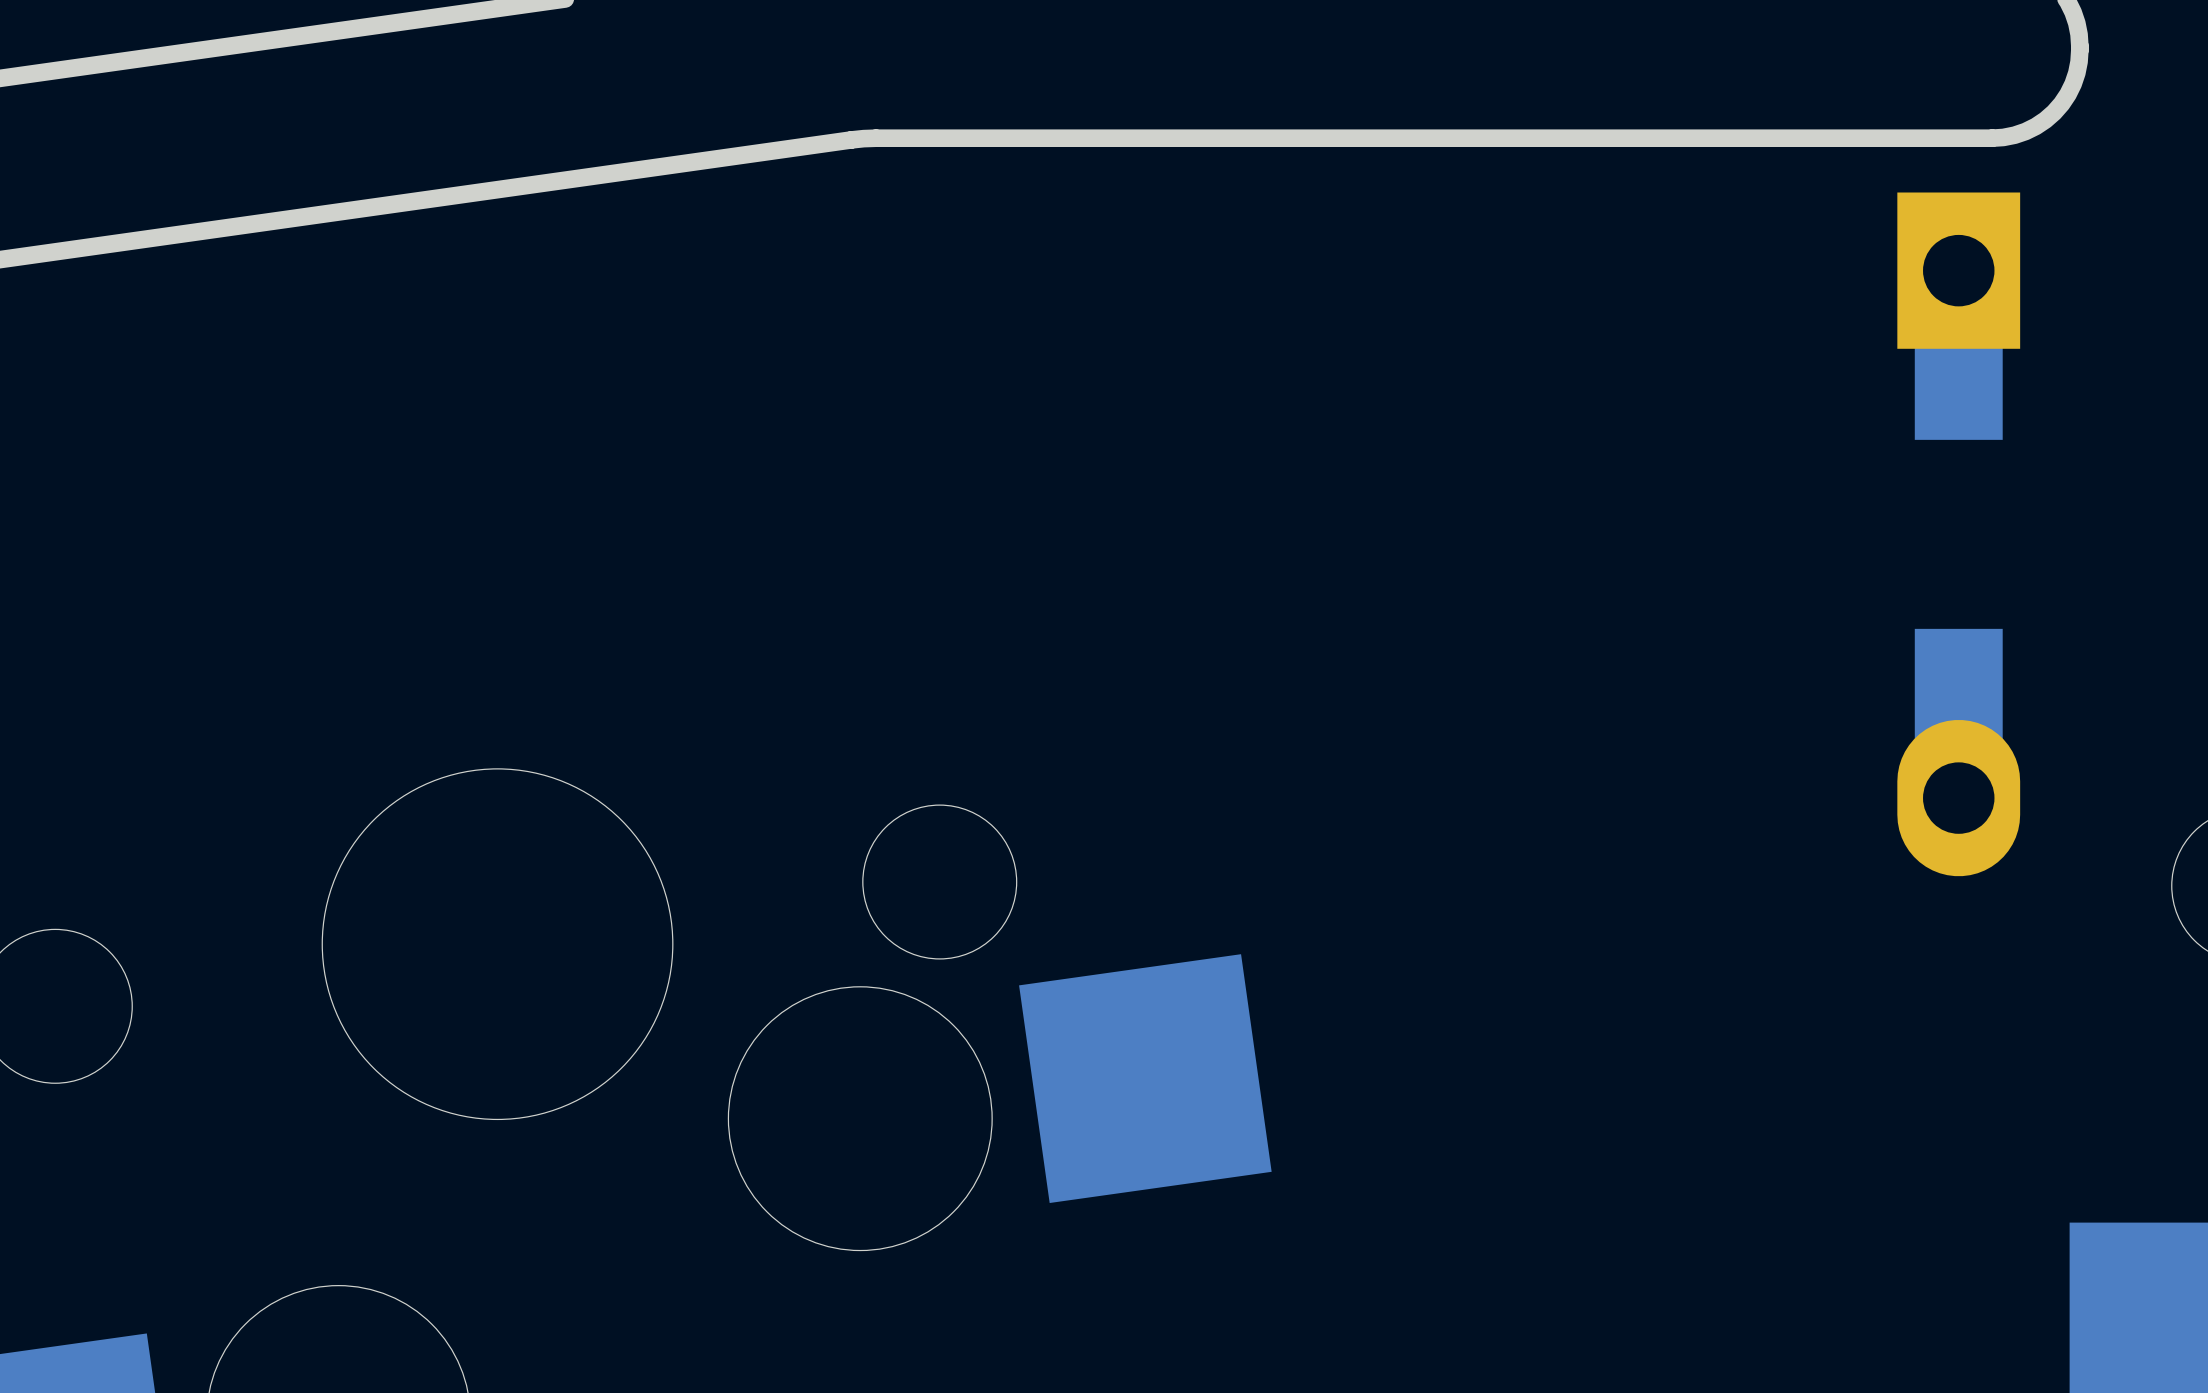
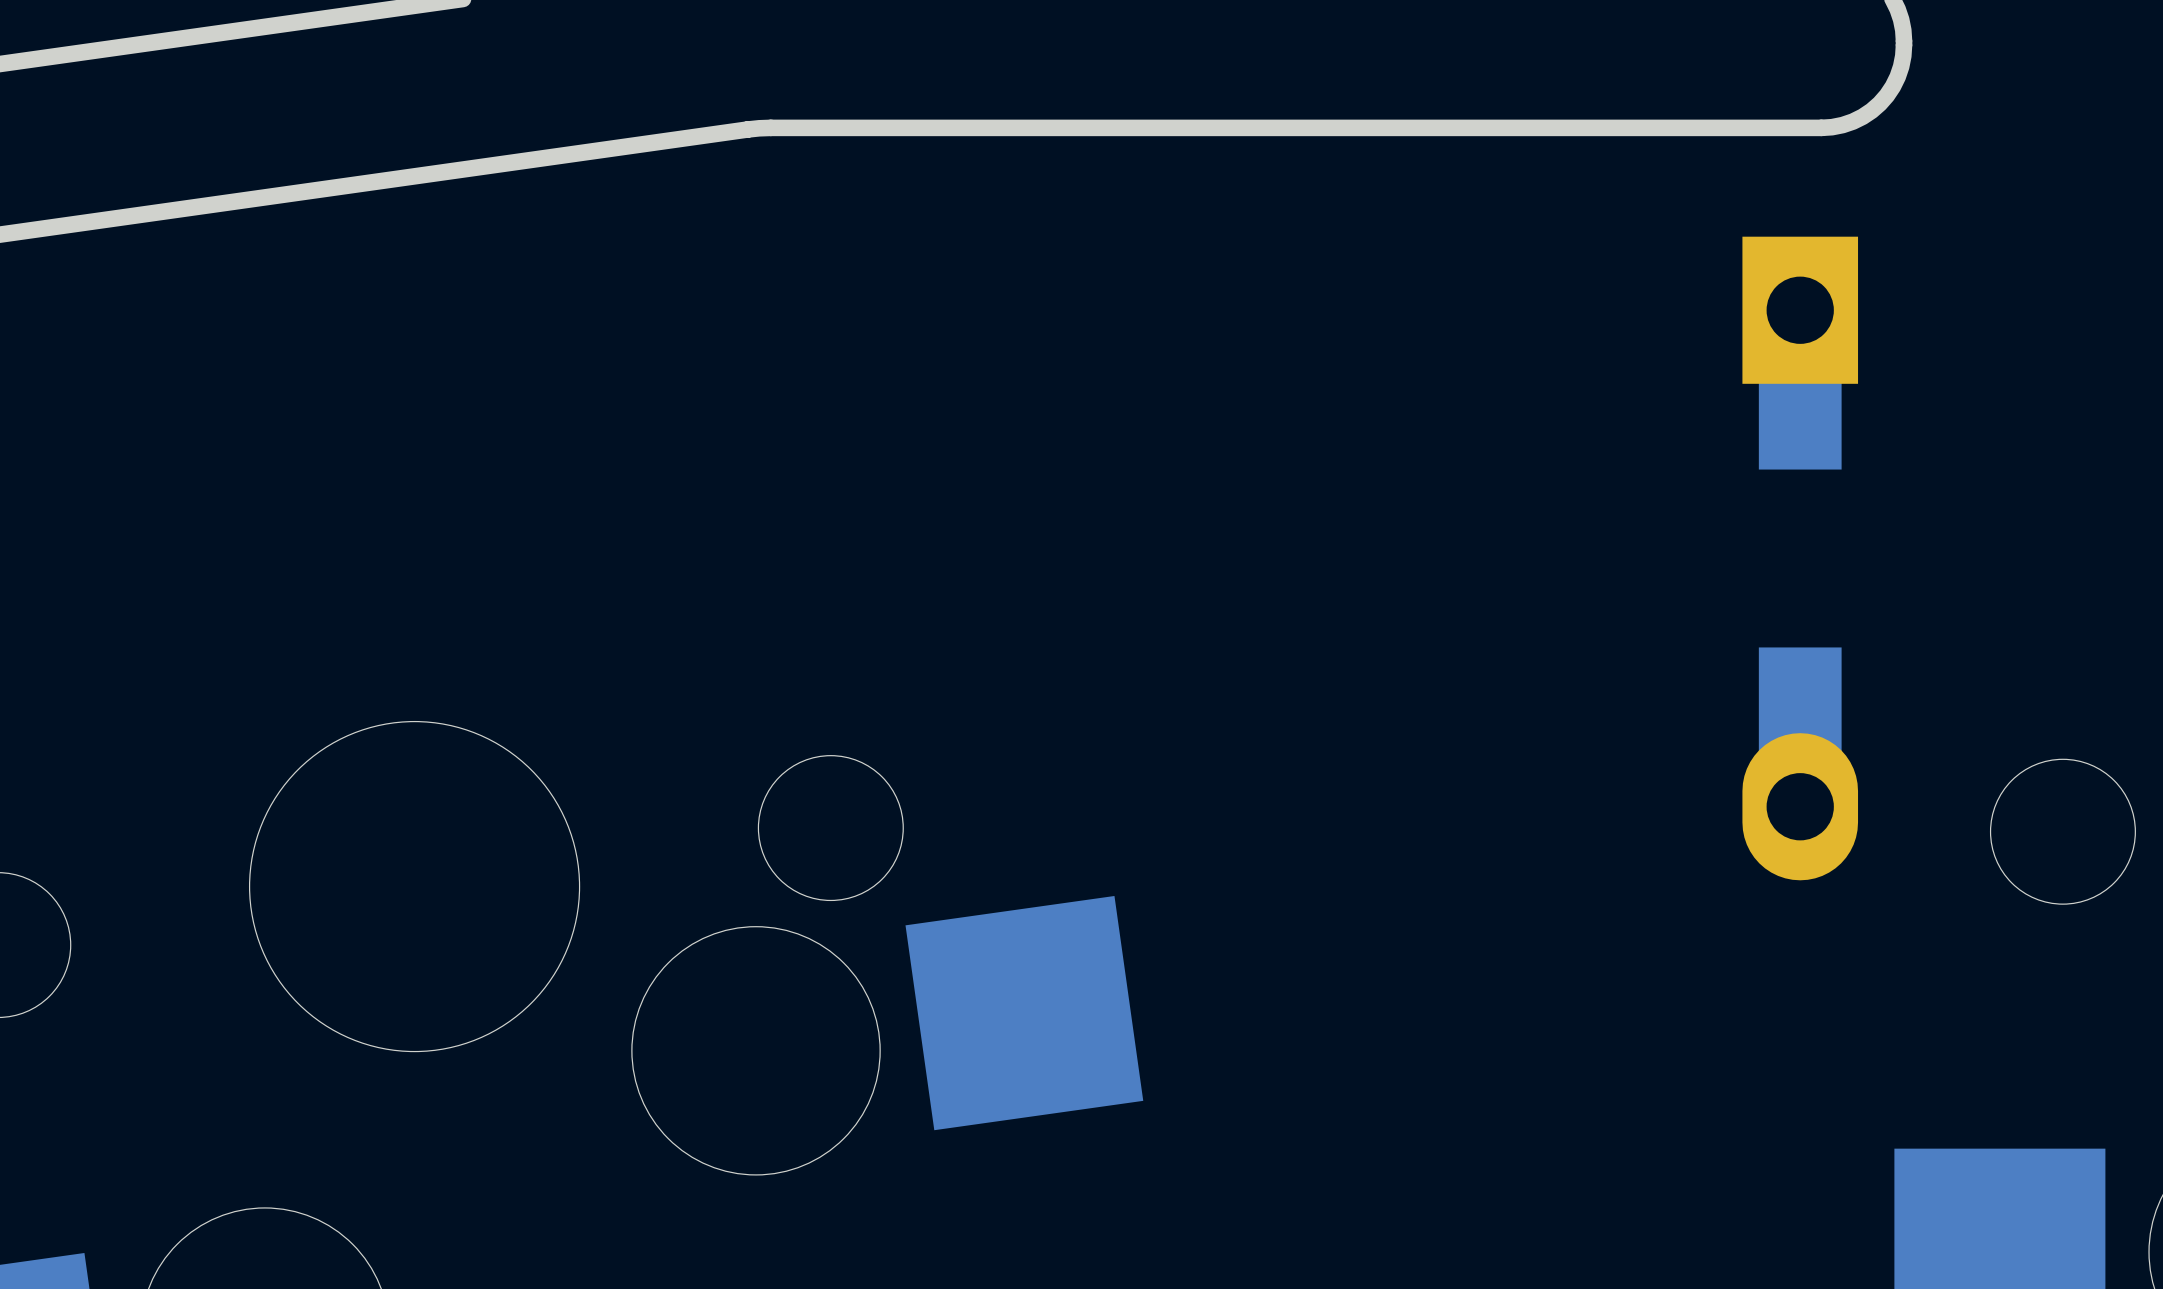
part position: (1958, 534) -> (1800, 558)

